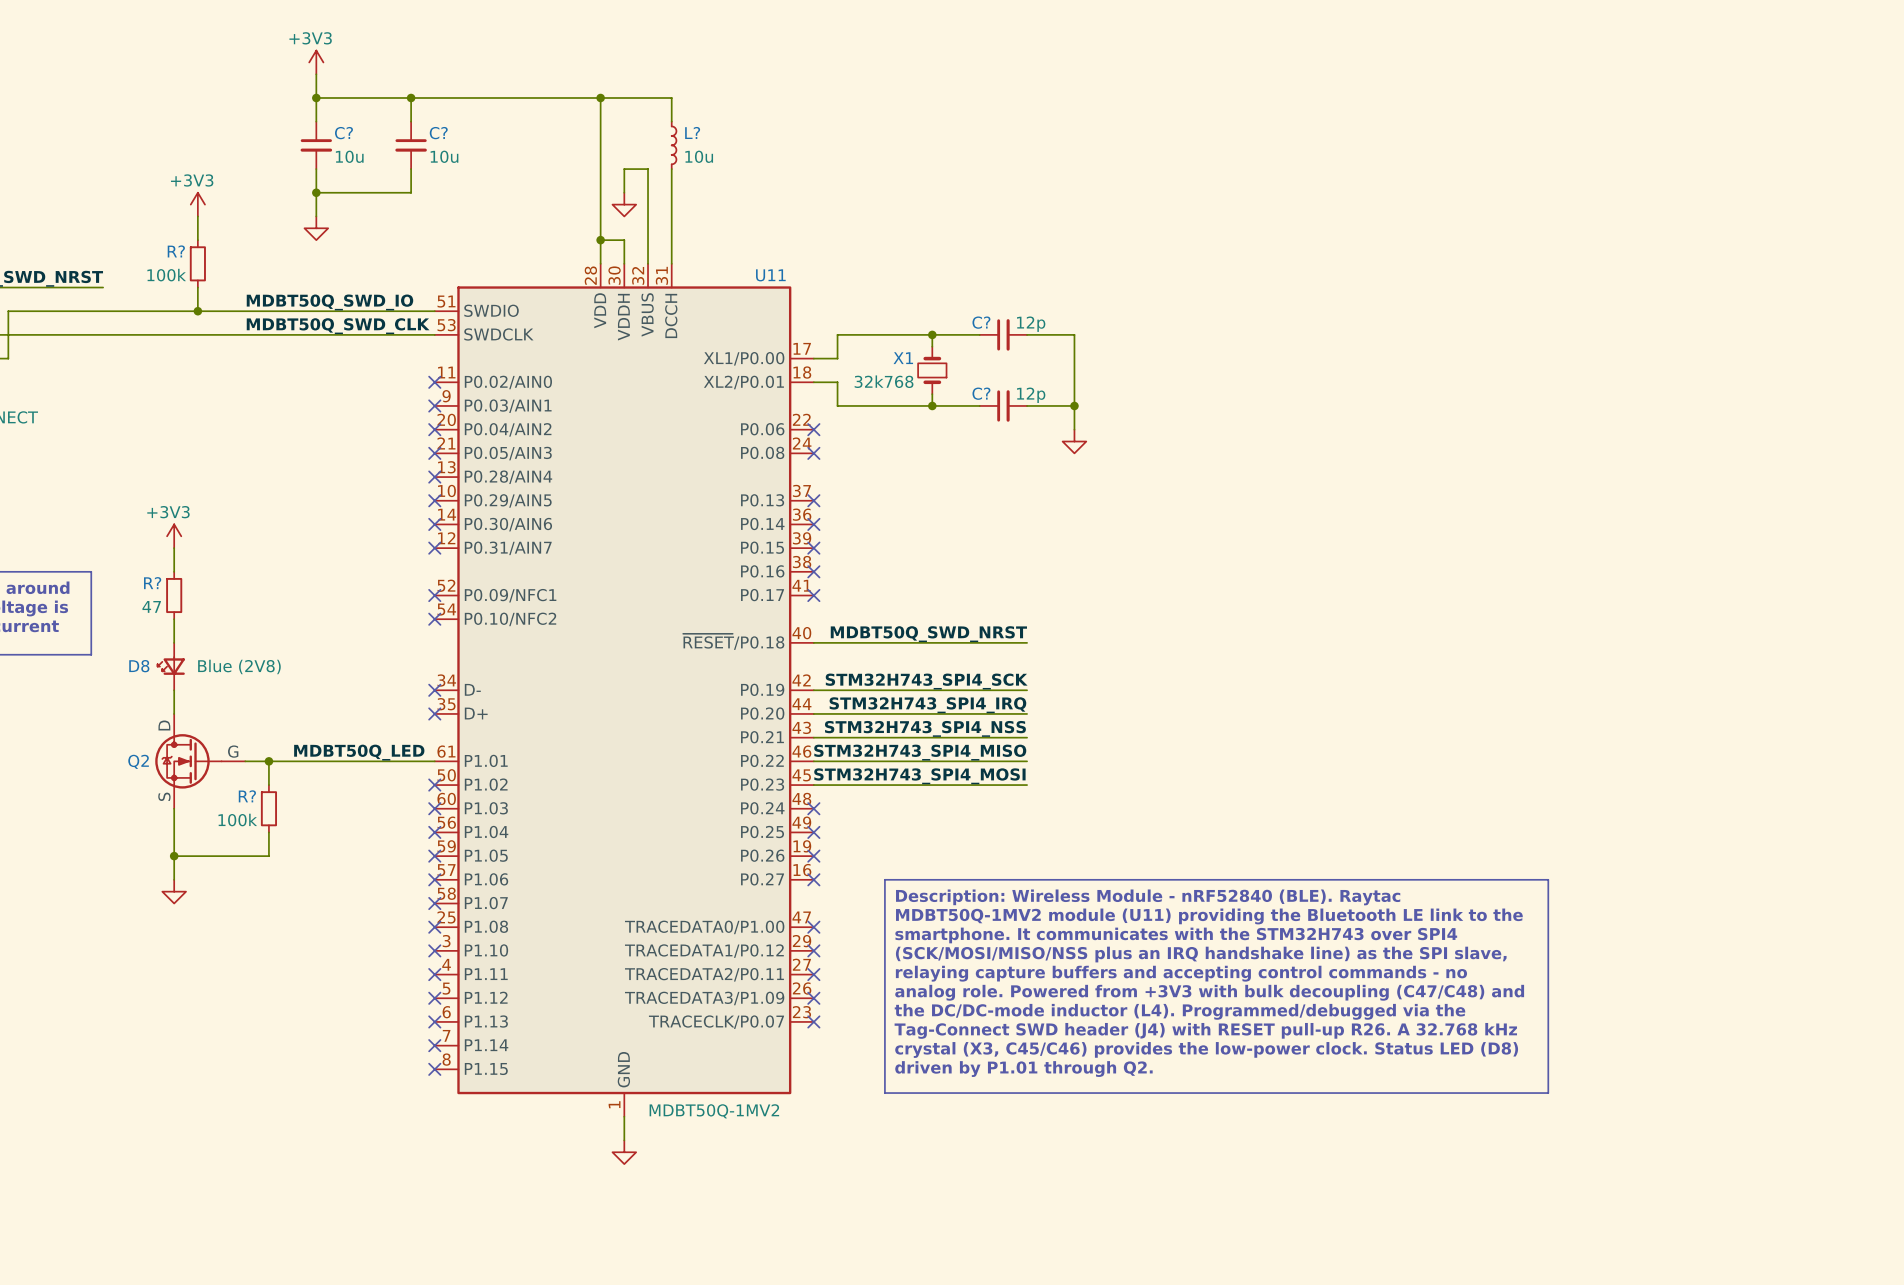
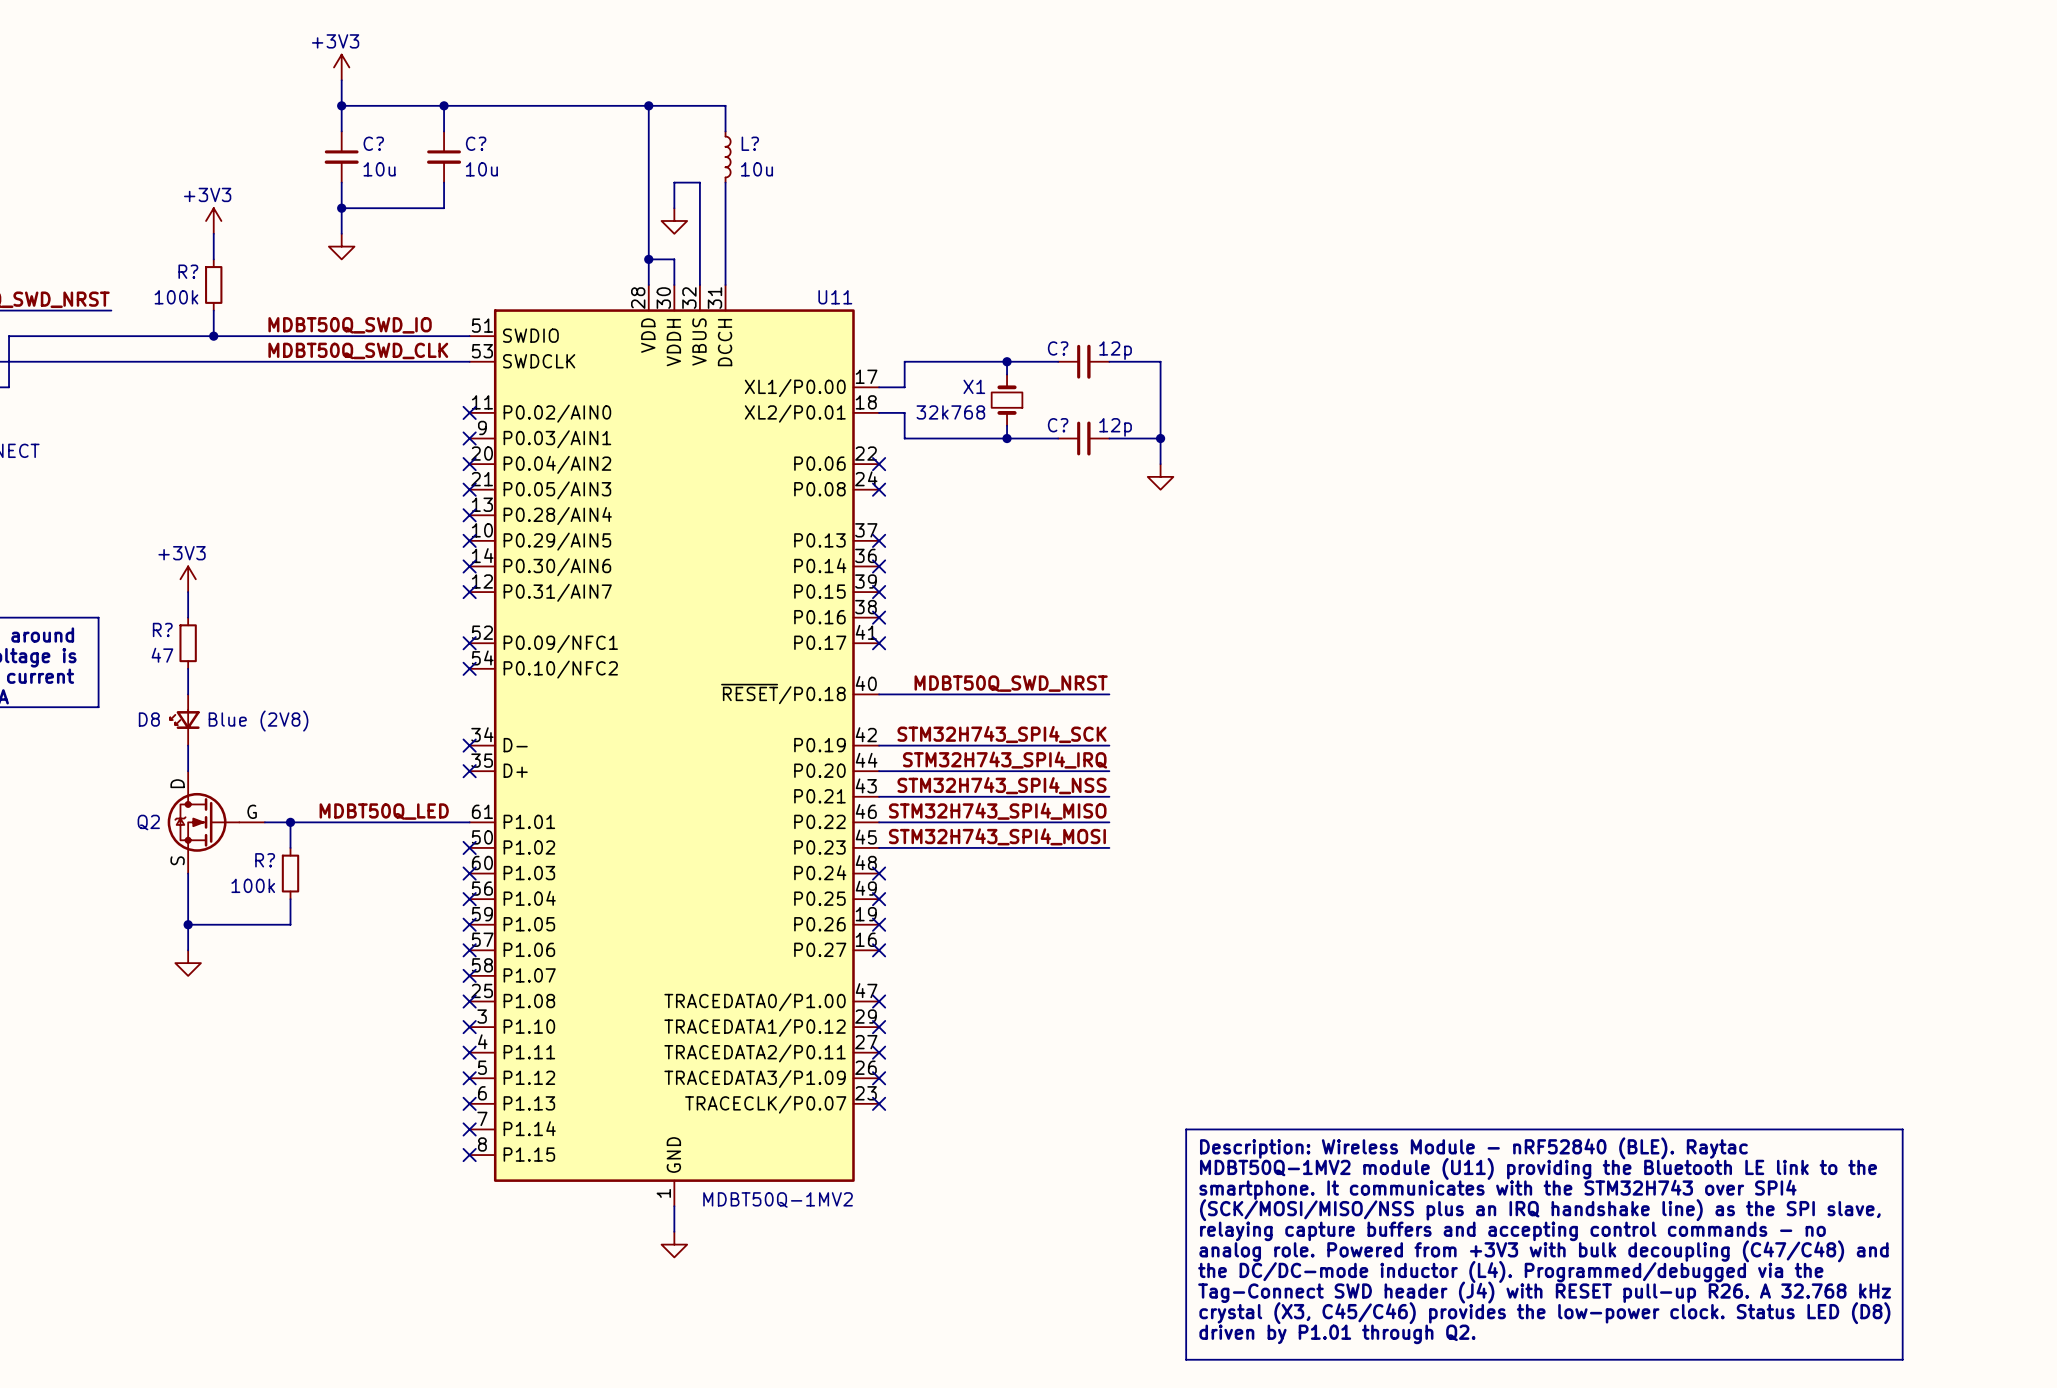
line: (884, 879) (1548, 879) (1548, 1093) (884, 1093) (884, 879) -> none
text: Description: Wireless Module - nRF52840 (BLE). Raytac (1148, 897) -> none
text: MDBT50Q-1MV2 module (U11) providing the Bluetooth LE link to the (1209, 916) -> none
text: smartphone. It communicates with the STM32H743 over SPI4 (1176, 935) -> none
text: (SCK/MOSI/MISO/NSS plus an IRQ handshake line) as the SPI slave, (1201, 954) -> none
text: relaying capture buffers and accepting control commands - no (1181, 973) -> none
text: analog role. Powered from +3V3 with bulk decoupling (C47/C48) and (1209, 992) -> none
text: the DC/DC-mode inductor (L4). Programmed/debugged via the (1179, 1011) -> none
text: Tag-Connect SWD header (J4) with RESET pull-up R26. A 32.768 kHz (1205, 1030) -> none
line: none -> (1186, 1129) (1902, 1129) (1902, 1359) (1186, 1359) (1186, 1129)
text: crystal (X3, C45/C46) provides the low-power clock. Status LED (D8) (1206, 1049) -> none
text: none -> Description: Wireless Module - nRF52840 (BLE). Raytac (1473, 1148)
text: driven by P1.01 through Q2. (1023, 1069) -> none
text: none -> MDBT50Q-1MV2 module (U11) providing the Bluetooth LE link to the (1538, 1168)
text: none -> smartphone. It communicates with the STM32H743 over SPI4 (1497, 1189)
text: none -> (SCK/MOSI/MISO/NSS plus an IRQ handshake line) as the SPI slave, (1540, 1210)
text: none -> relaying capture buffers and accepting control commands - no (1512, 1231)
text: none -> analog role. Powered from +3V3 with bulk decoupling (C47/C48) and (1543, 1251)
text: none -> the DC/DC-mode inductor (L4). Programmed/debugged via the (1510, 1271)
text: none -> Tag-Connect SWD header (J4) with RESET pull-up R26. A 32.768 kHz (1544, 1292)
text: none -> crystal (X3, C45/C46) provides the low-power clock. Status LED (D8) (1544, 1313)
text: none -> driven by P1.01 through Q2. (1337, 1334)

